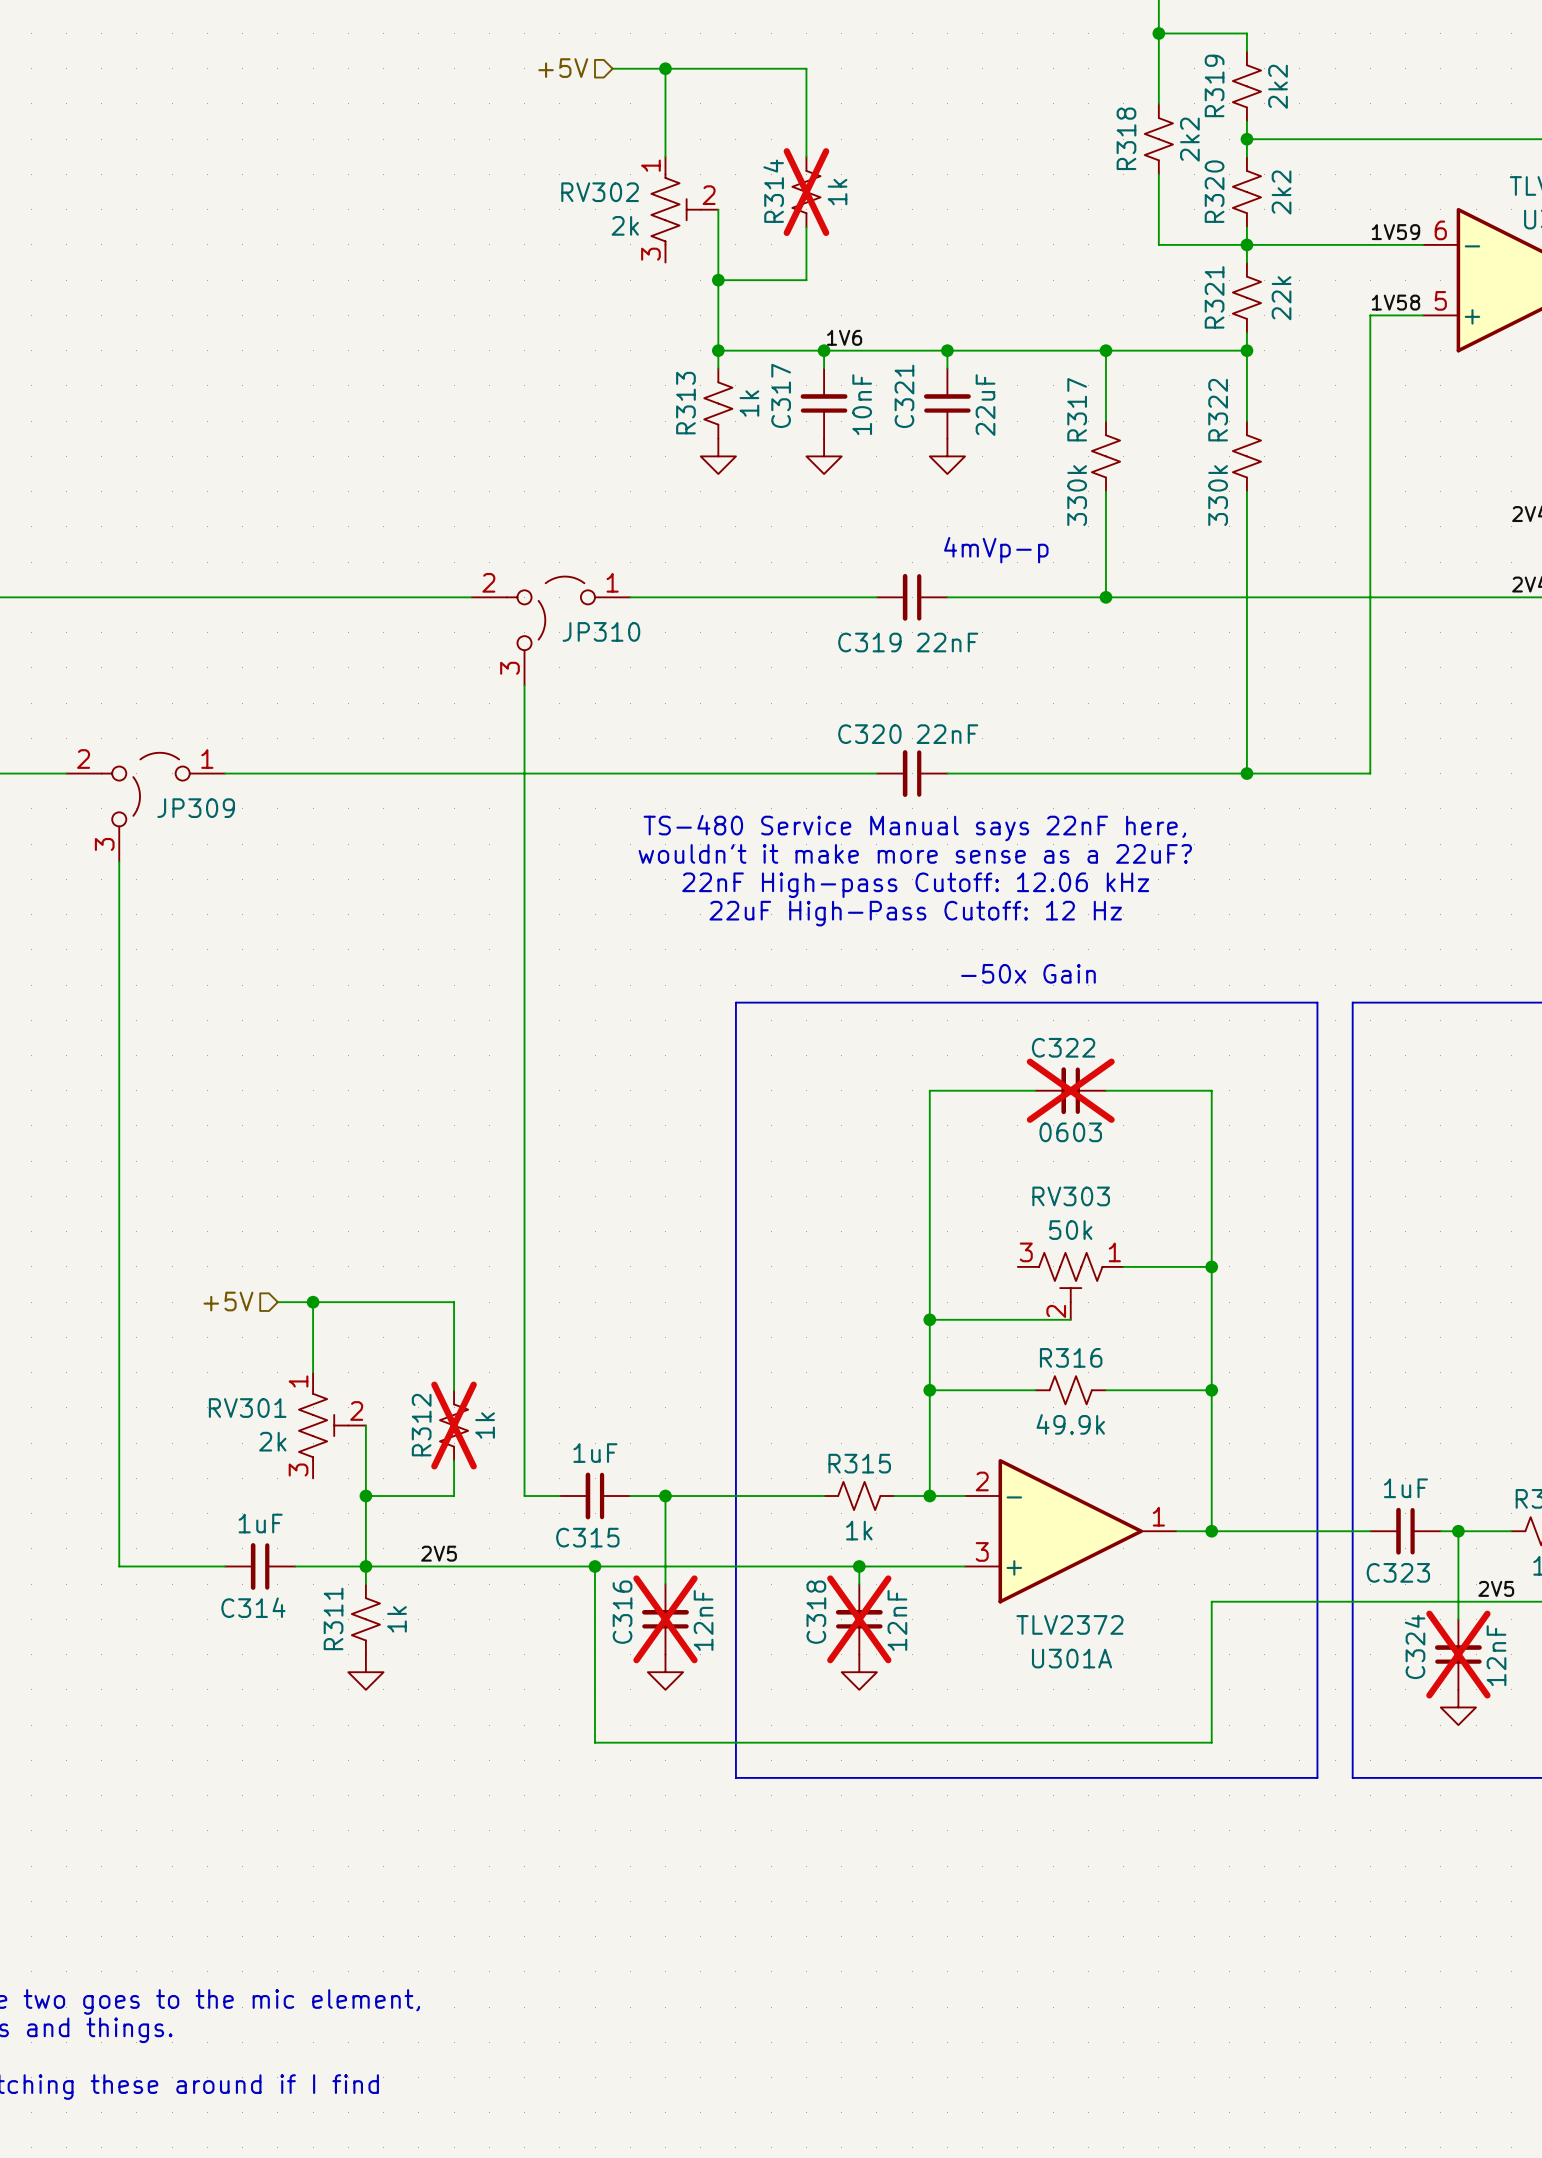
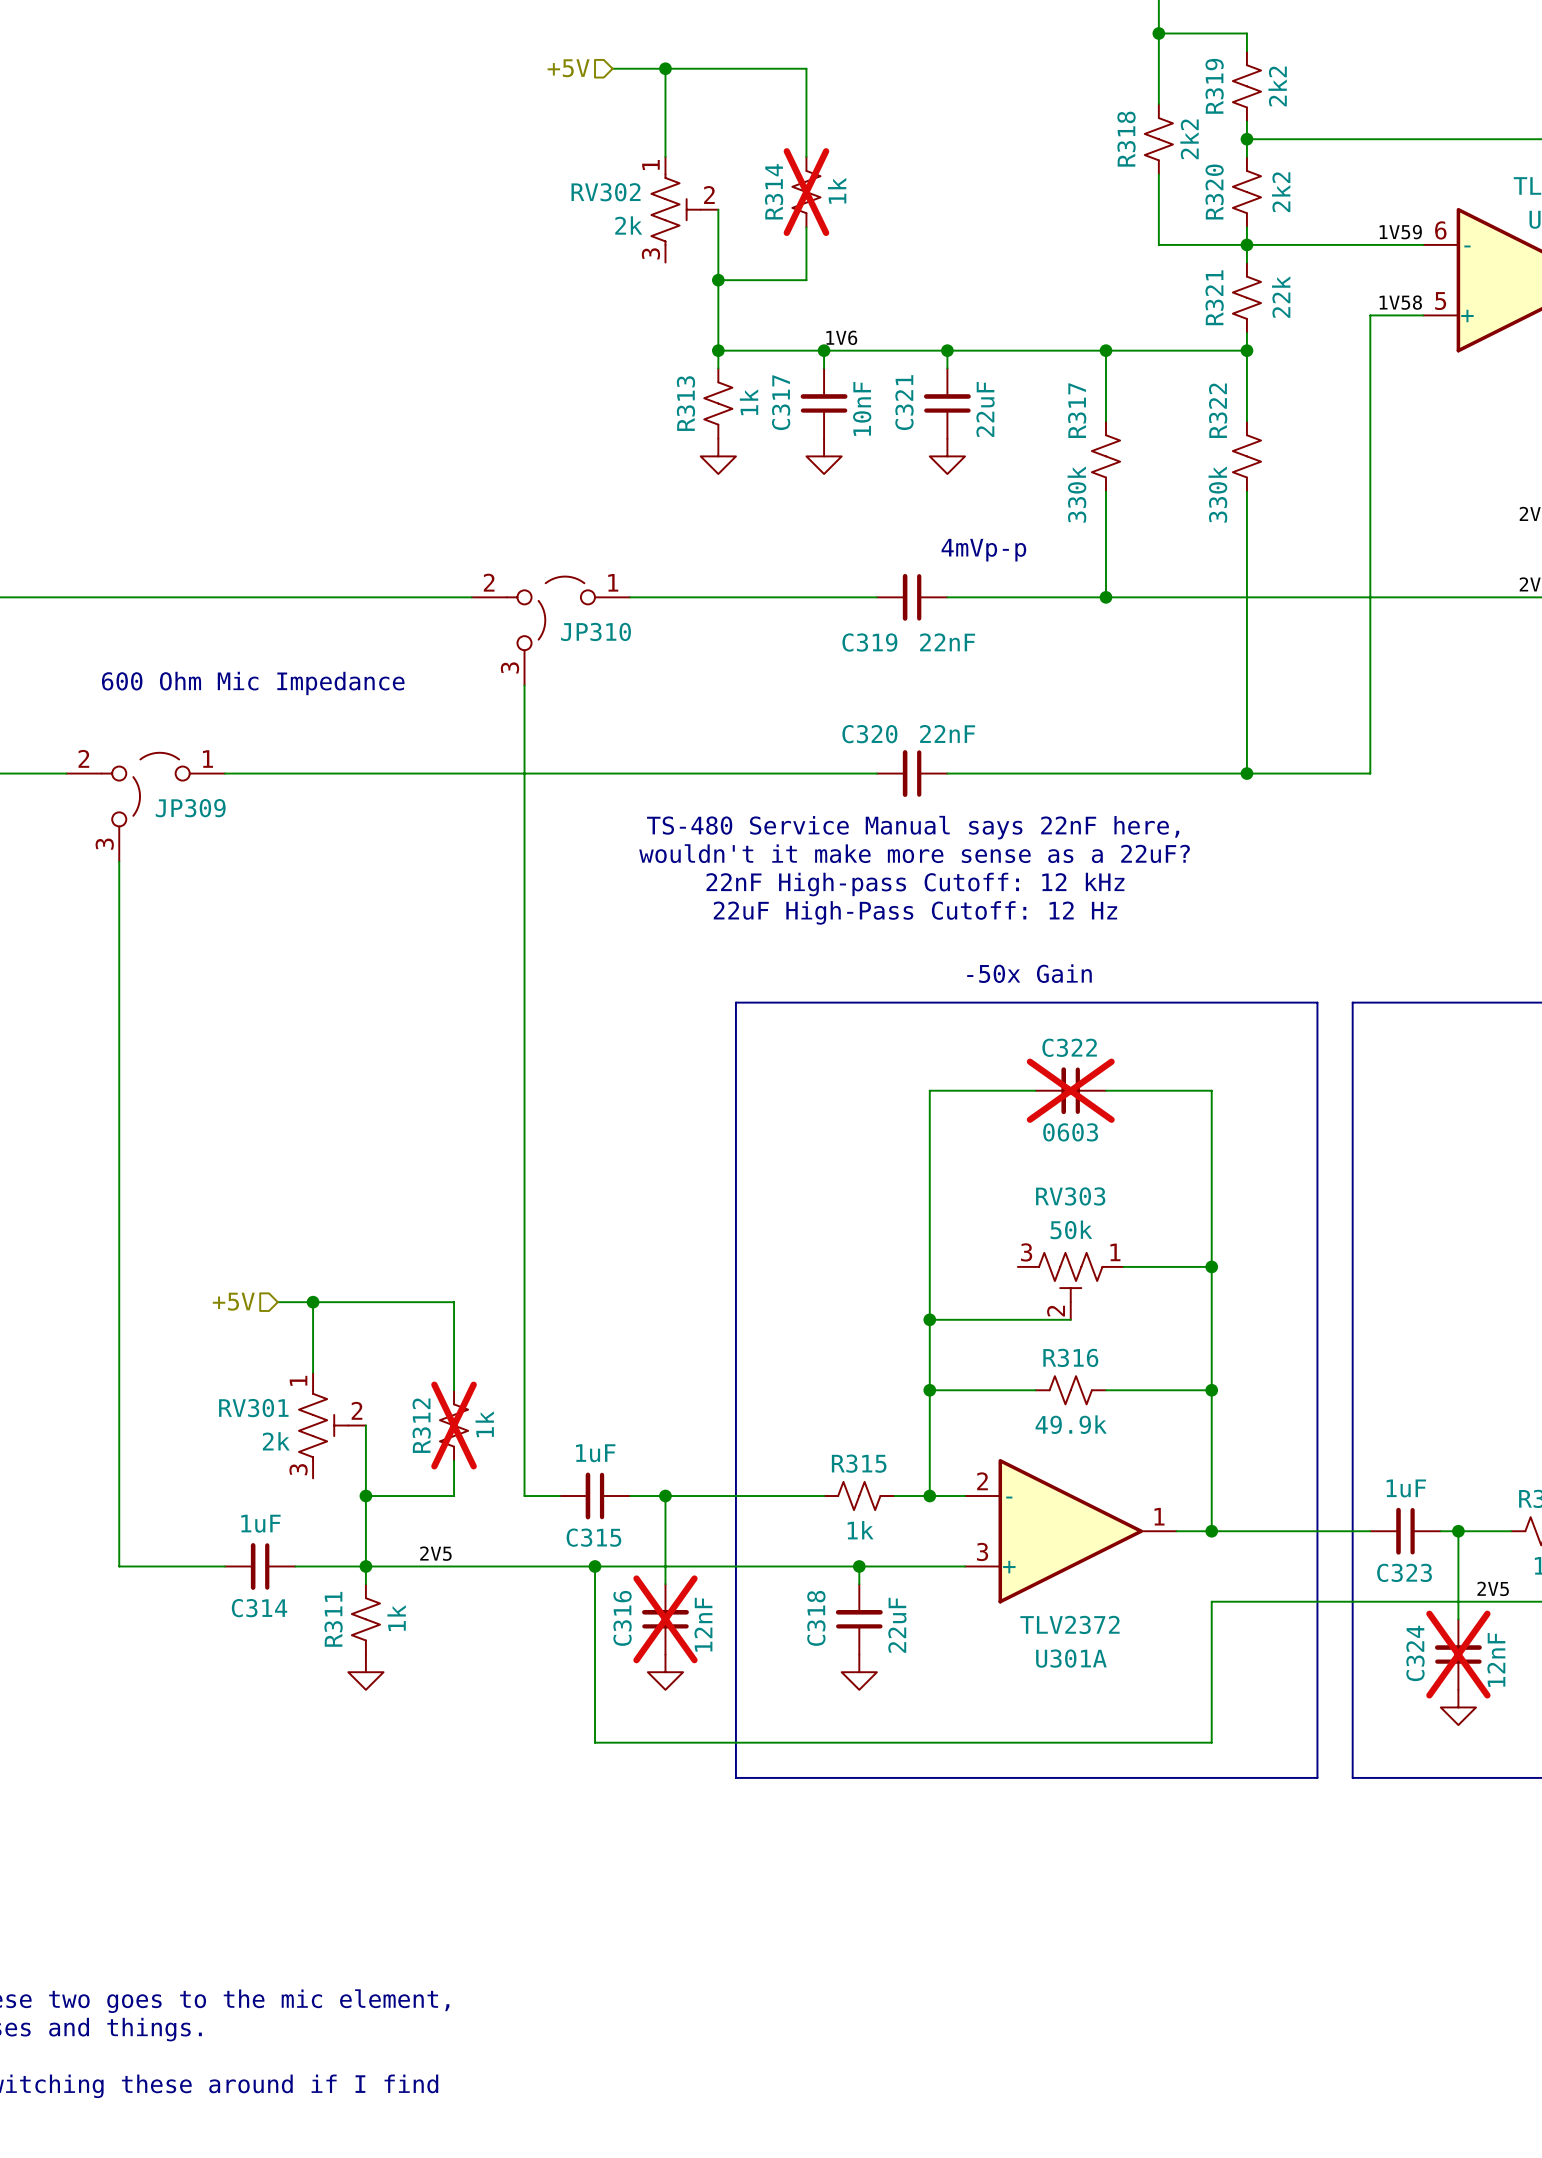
text: none -> 600 Ohm Mic Impedance (253, 683)
text: 22nF High-pass Cutoff: 12.06 kHz (915, 885) -> 22nF High-pass Cutoff: 12 kHz (915, 884)
C318 do-not-place cross: (859, 1619) -> none
C318 value: 12nF (897, 1620) -> 22uF (897, 1625)

